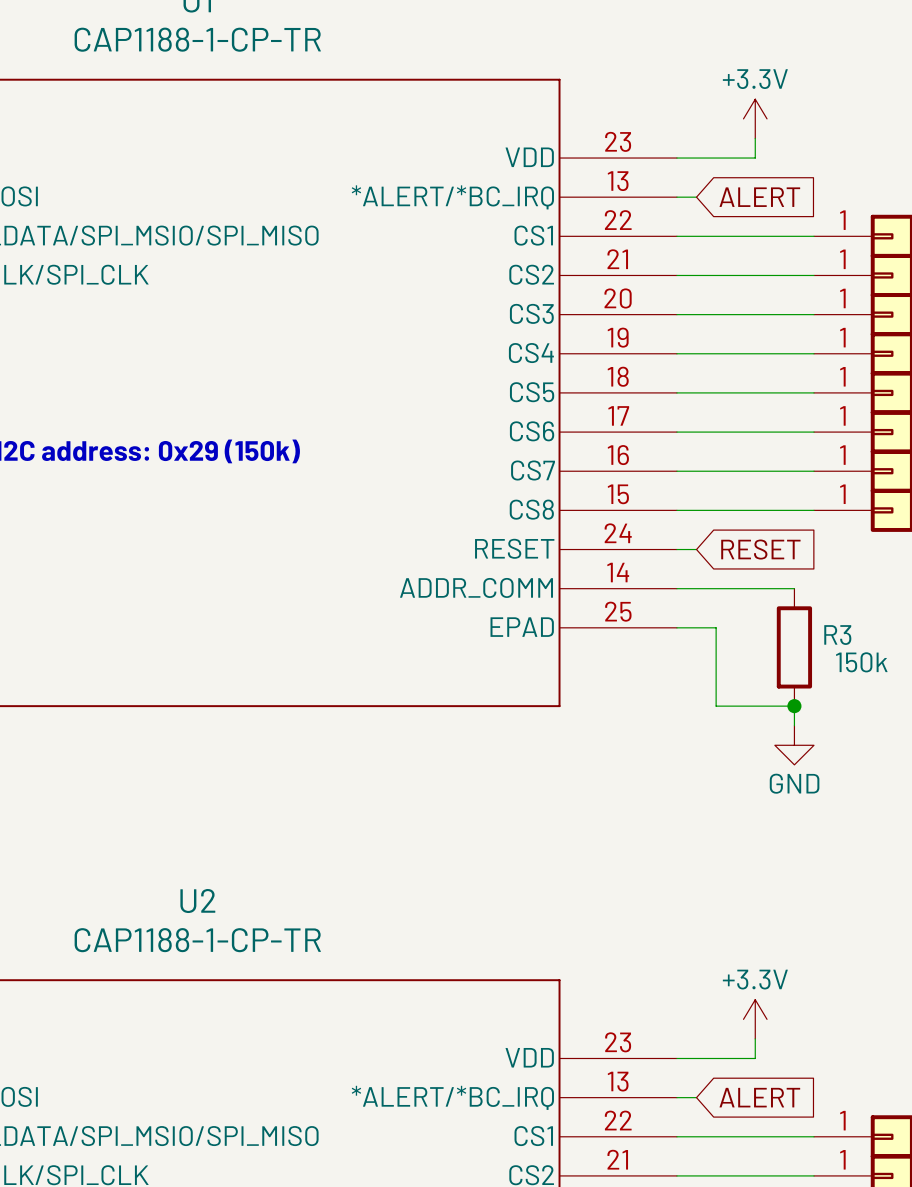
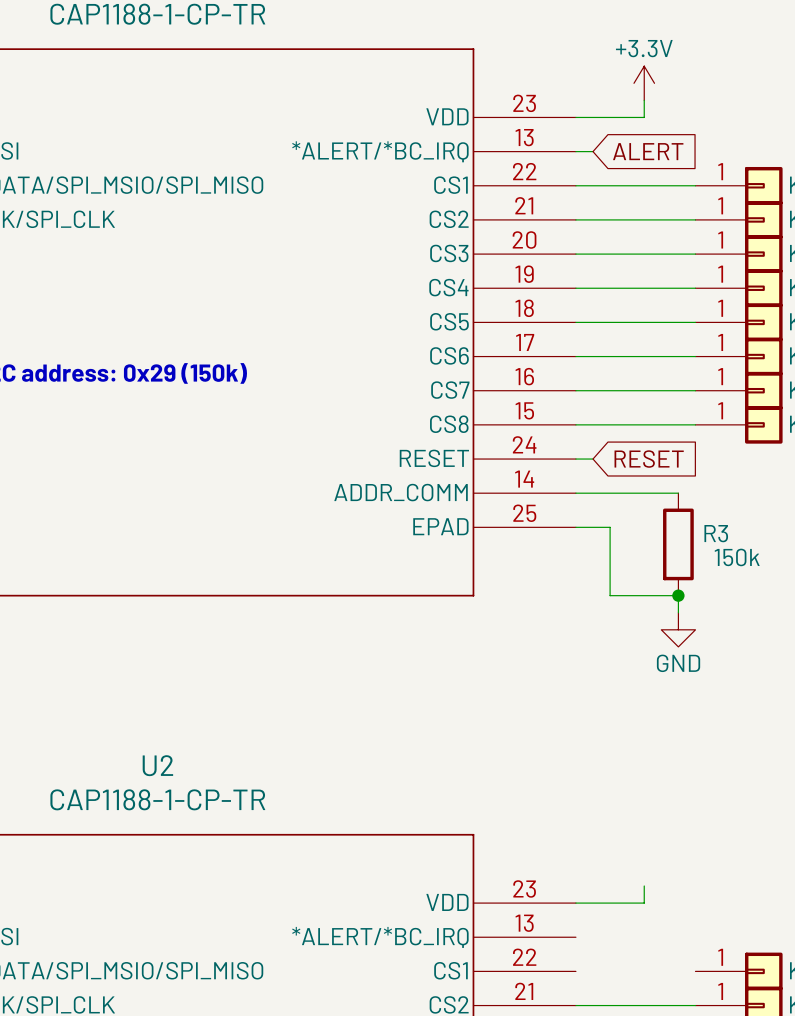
power symbol: +3.3V (755, 1019) -> none
wire: (676, 1097) (696, 1097) -> none
global label: ALERT (759, 1097) -> none
wire: (676, 1136) (814, 1136) -> none

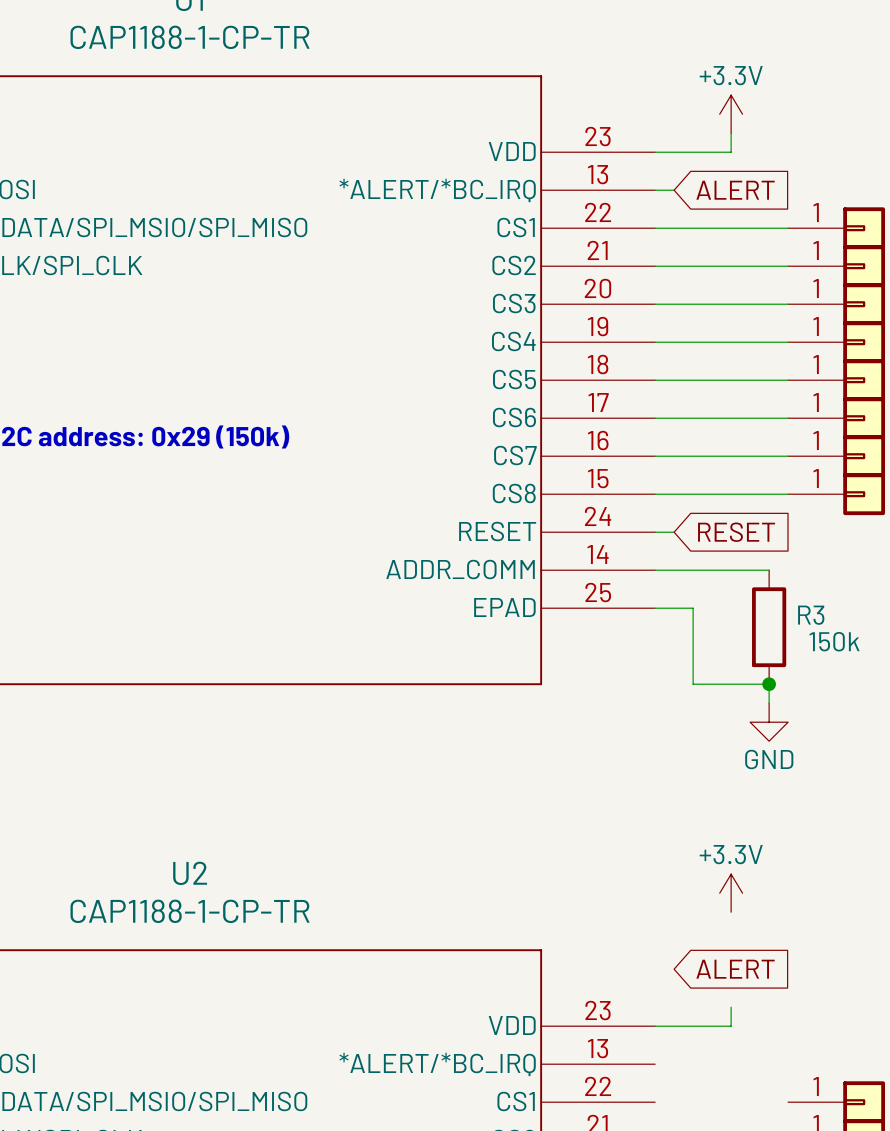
power symbol: none -> +3.3V (731, 893)
global label: none -> ALERT (735, 969)

